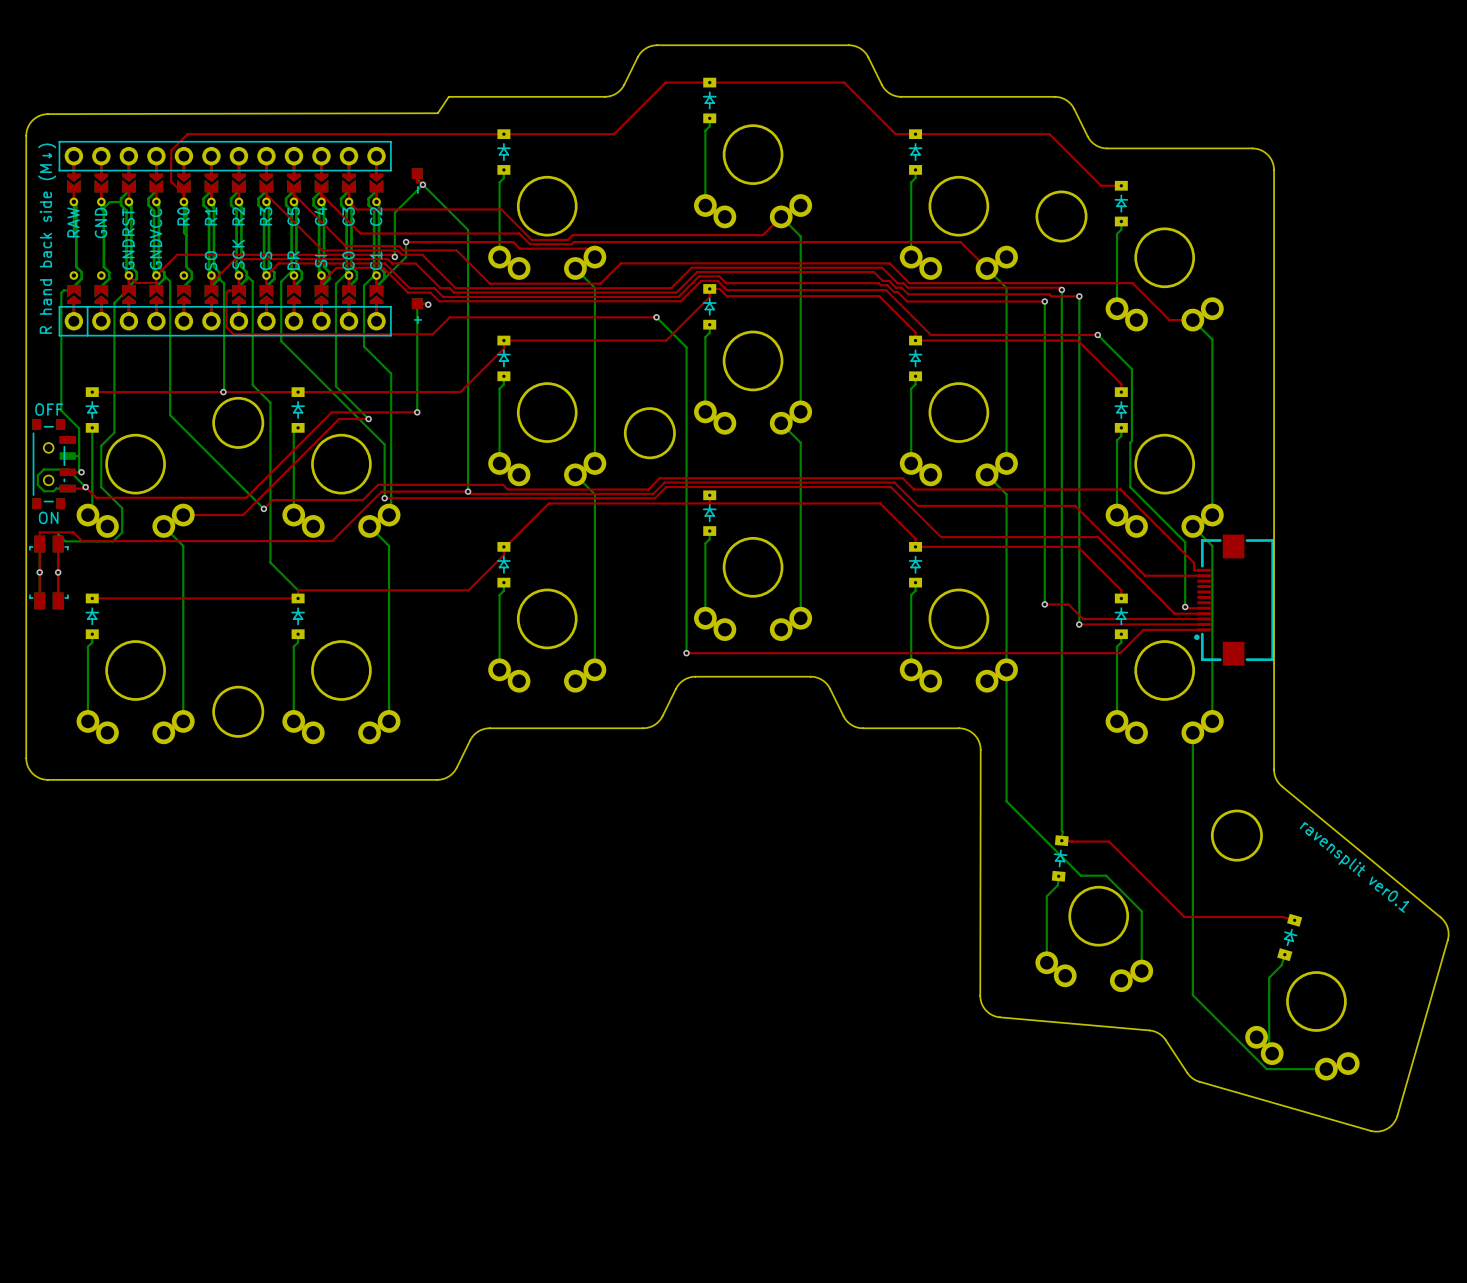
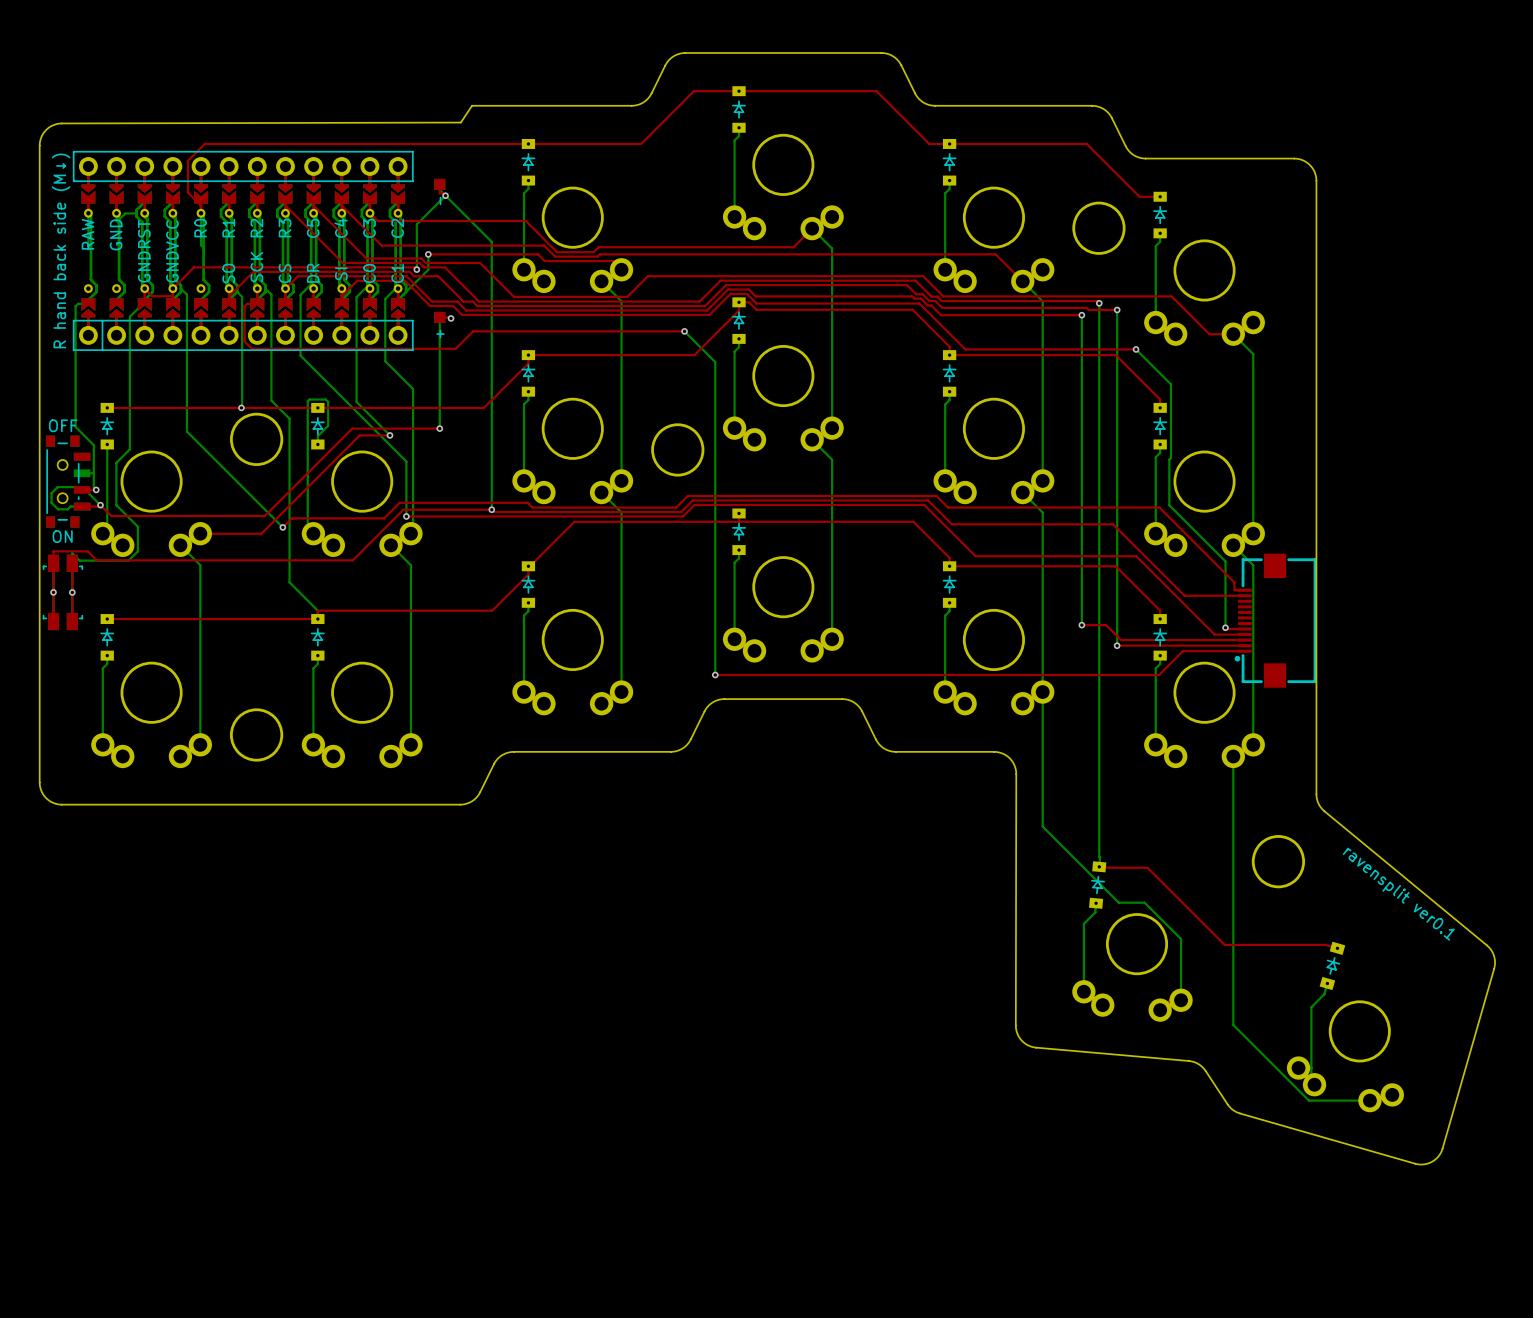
bottom track: (298, 427) (293, 432) (293, 515) -> (317, 444) (317, 436) (328, 425) (328, 401) (325, 399) (309, 399) (307, 401) (307, 528)

